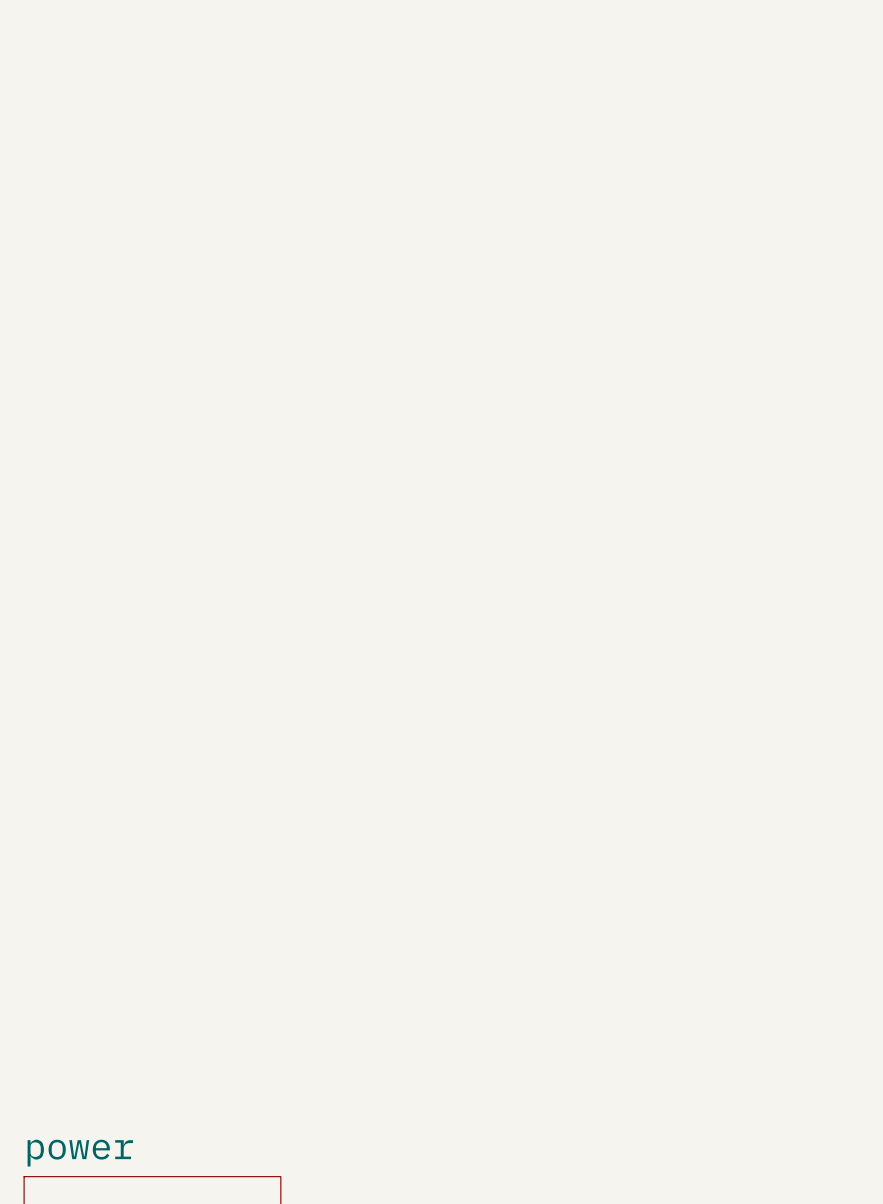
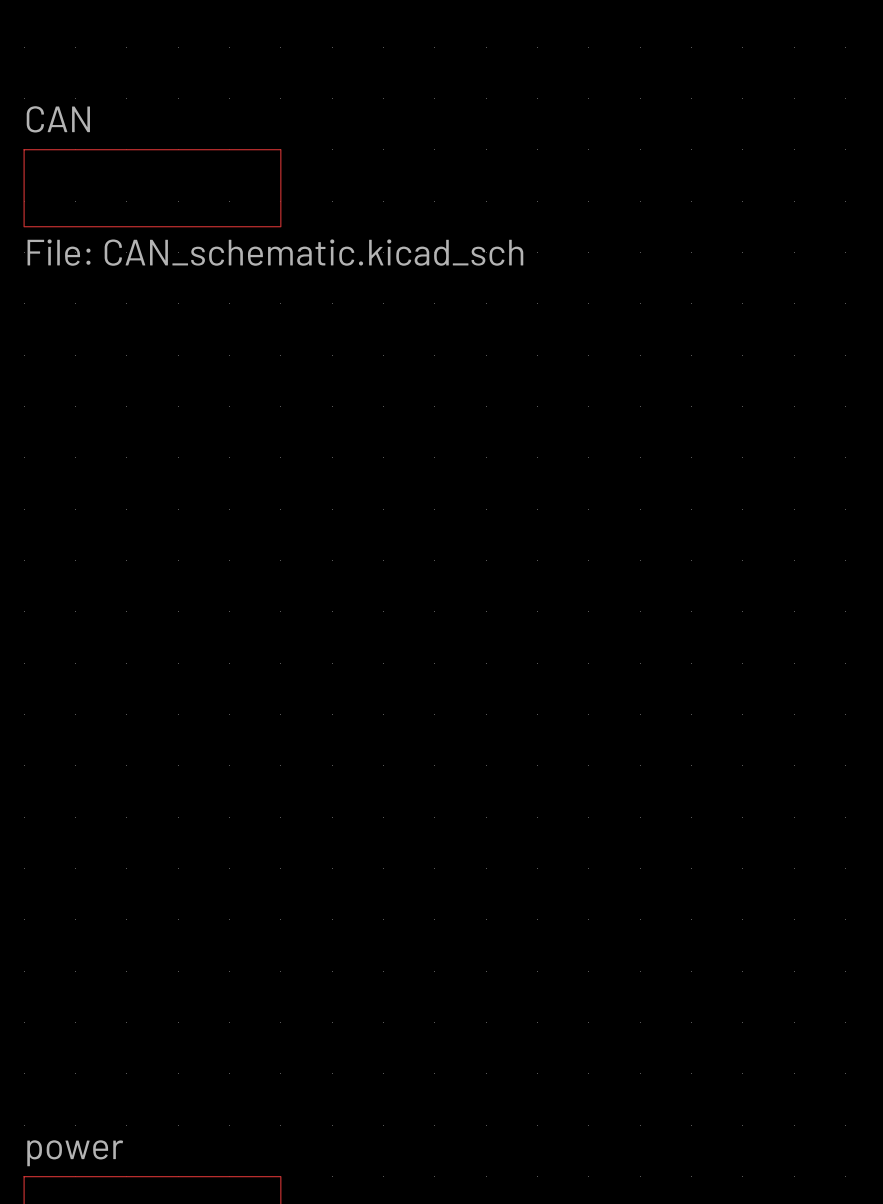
sheet CAN: none -> File: CAN_schematic.kicad_sch (152, 188)

